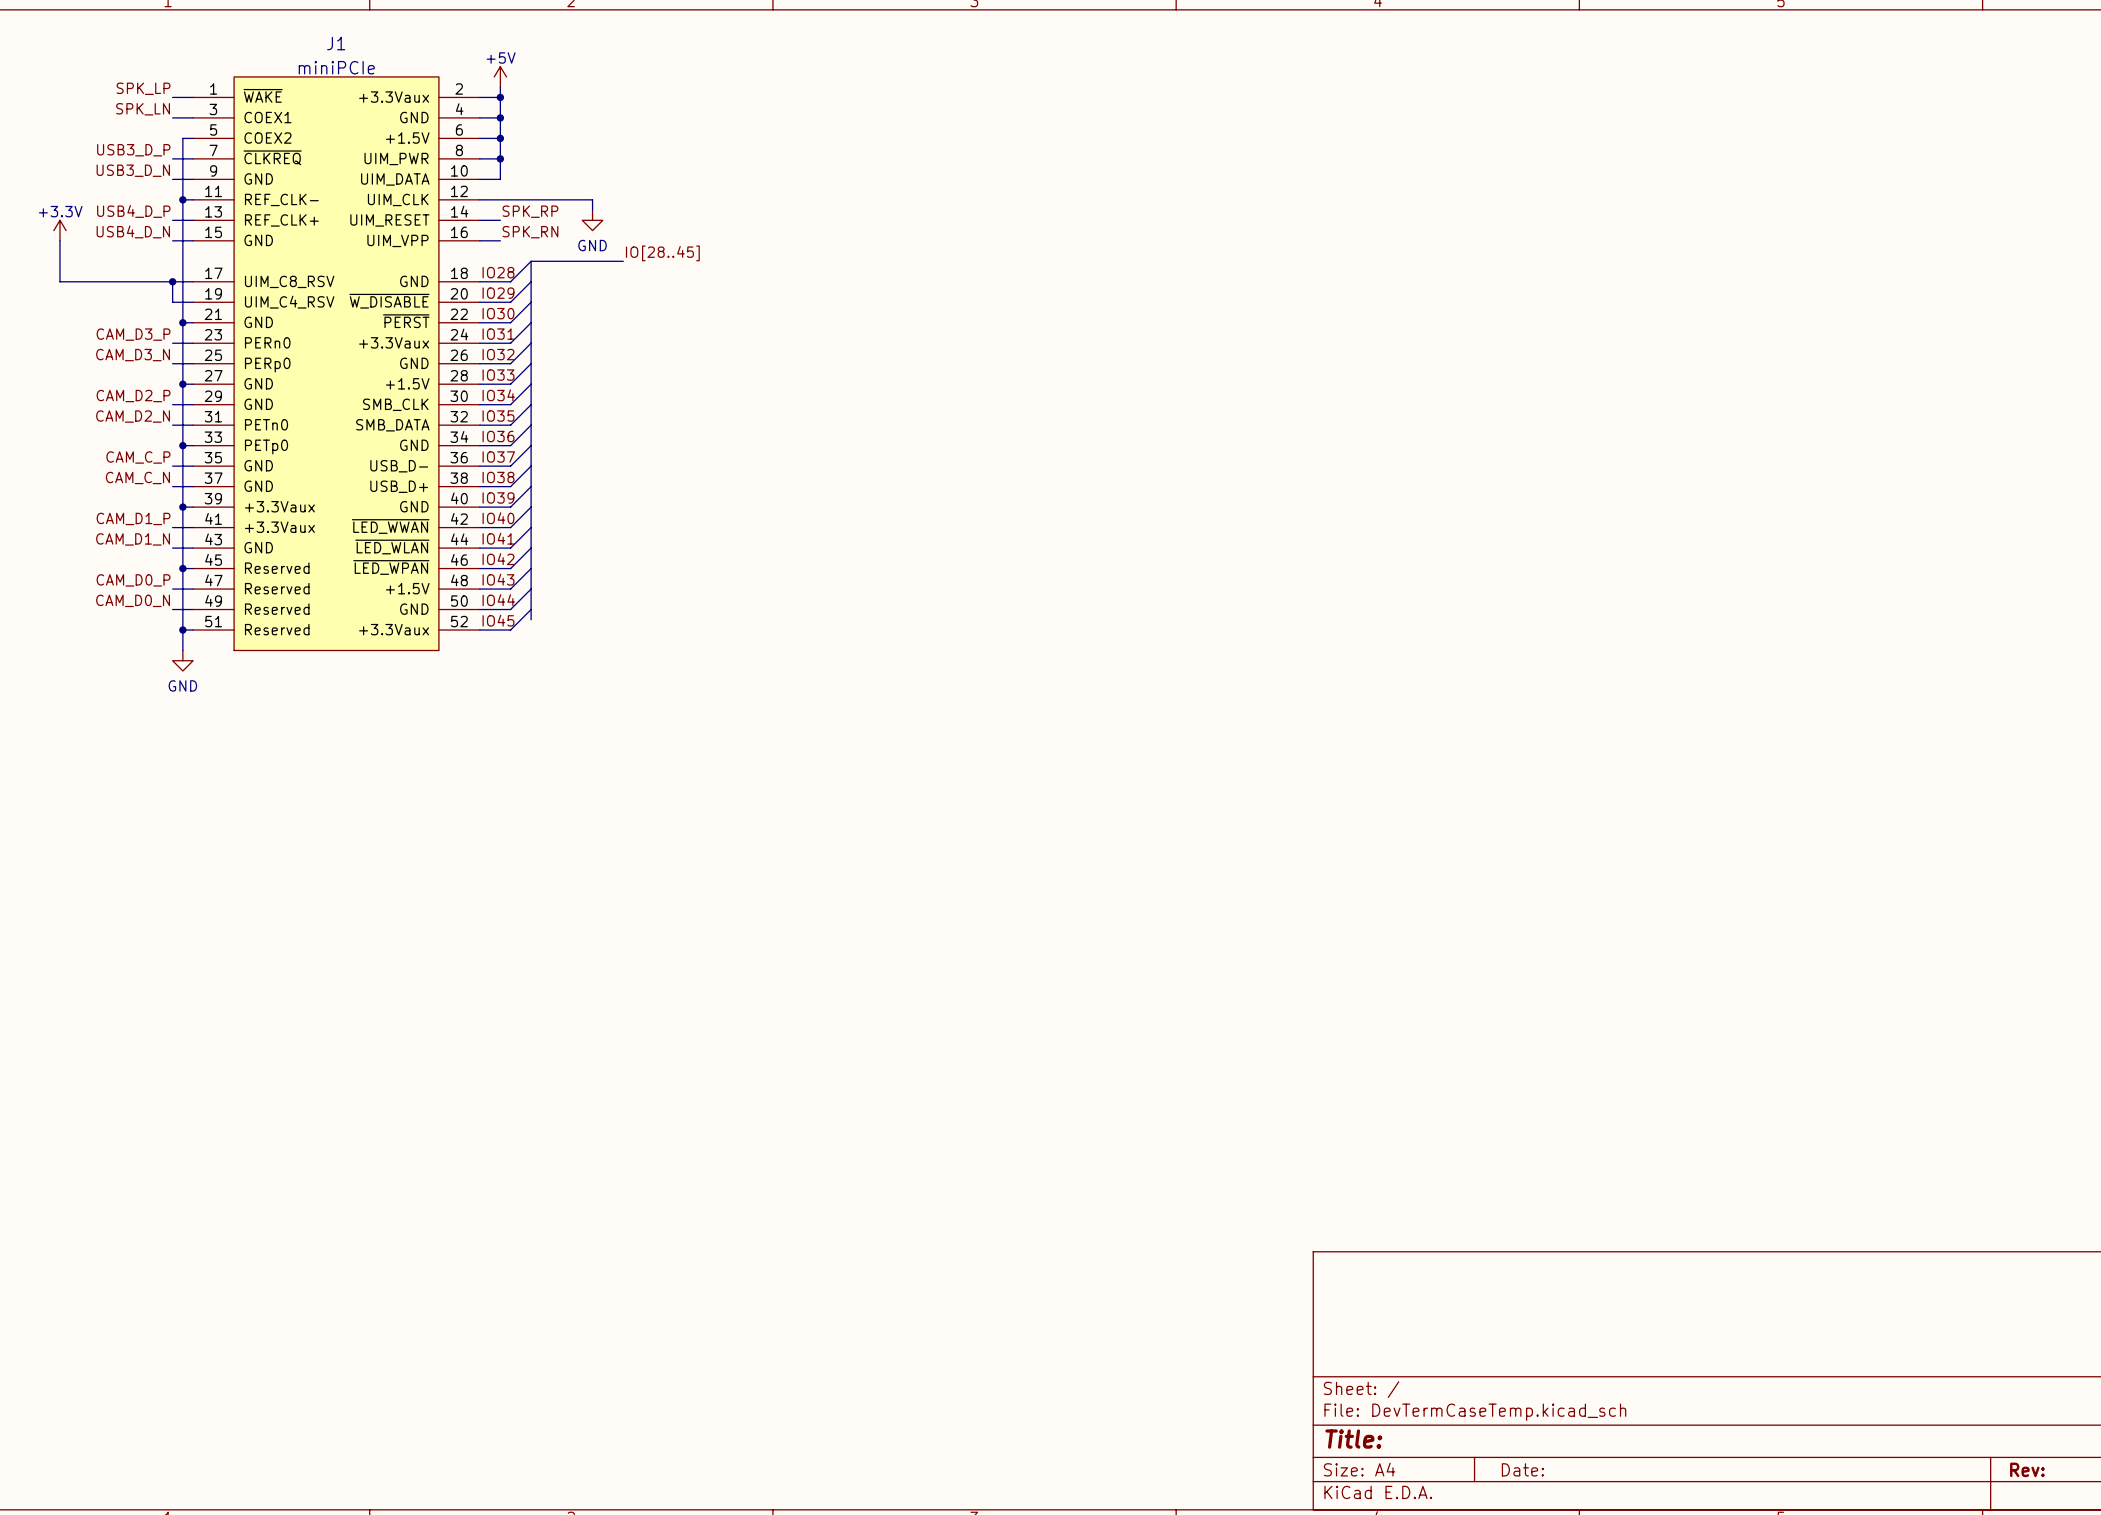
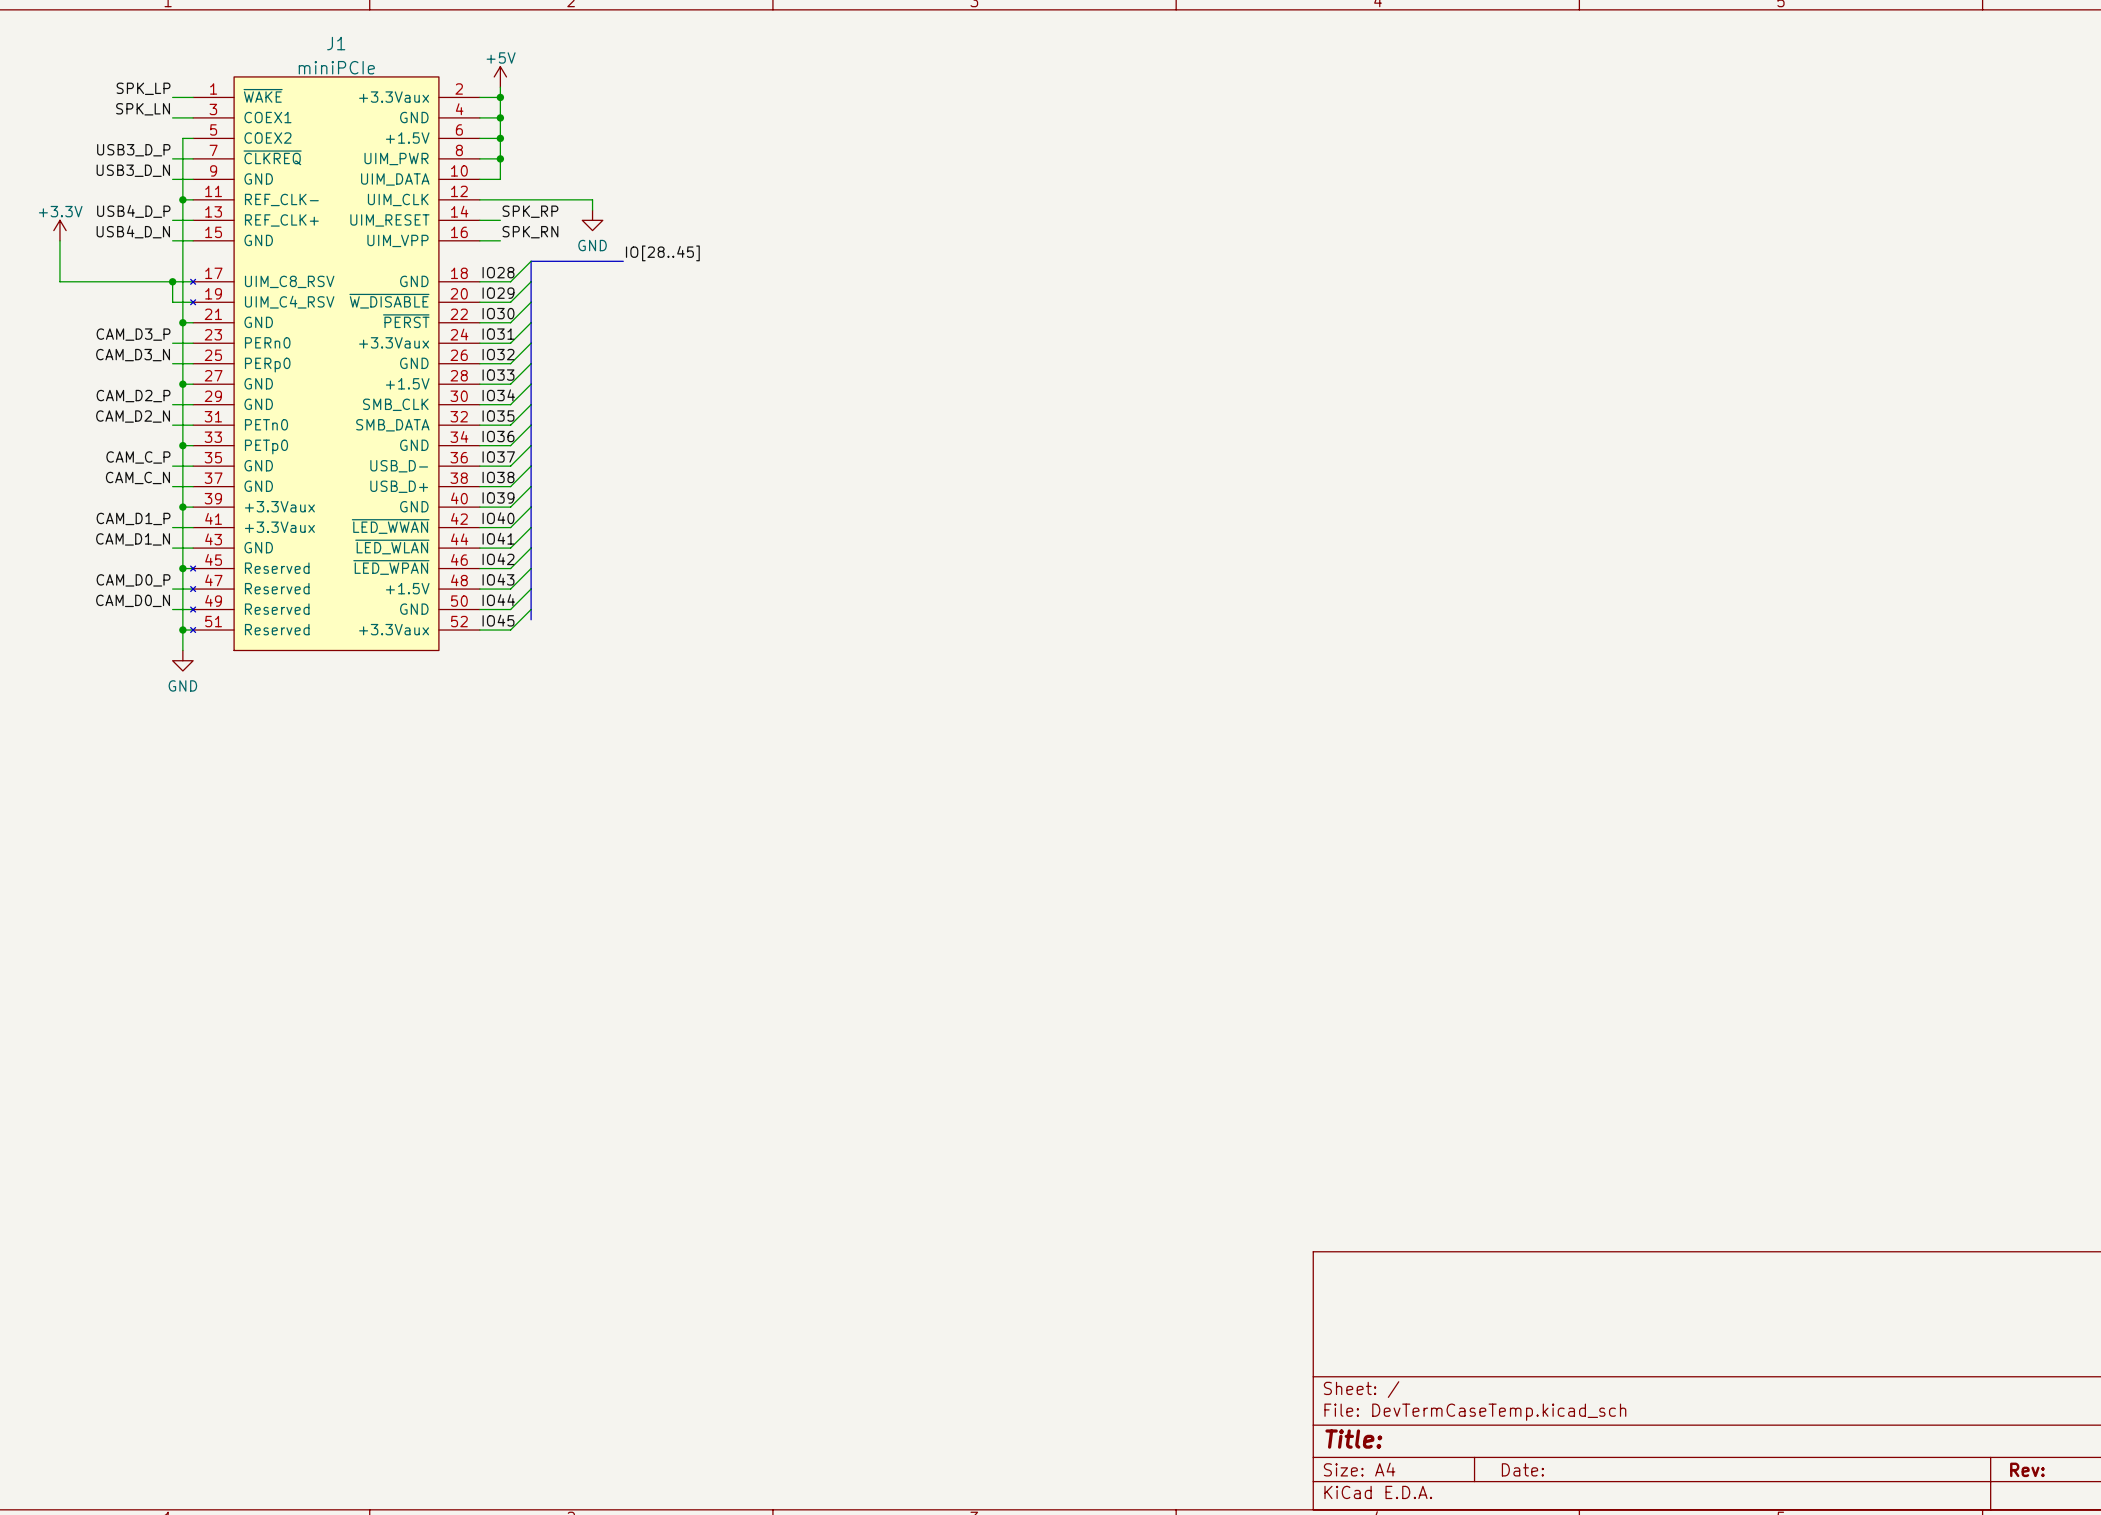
J1 symbol: [193, 76, 480, 651] -> [190, 76, 480, 651]

